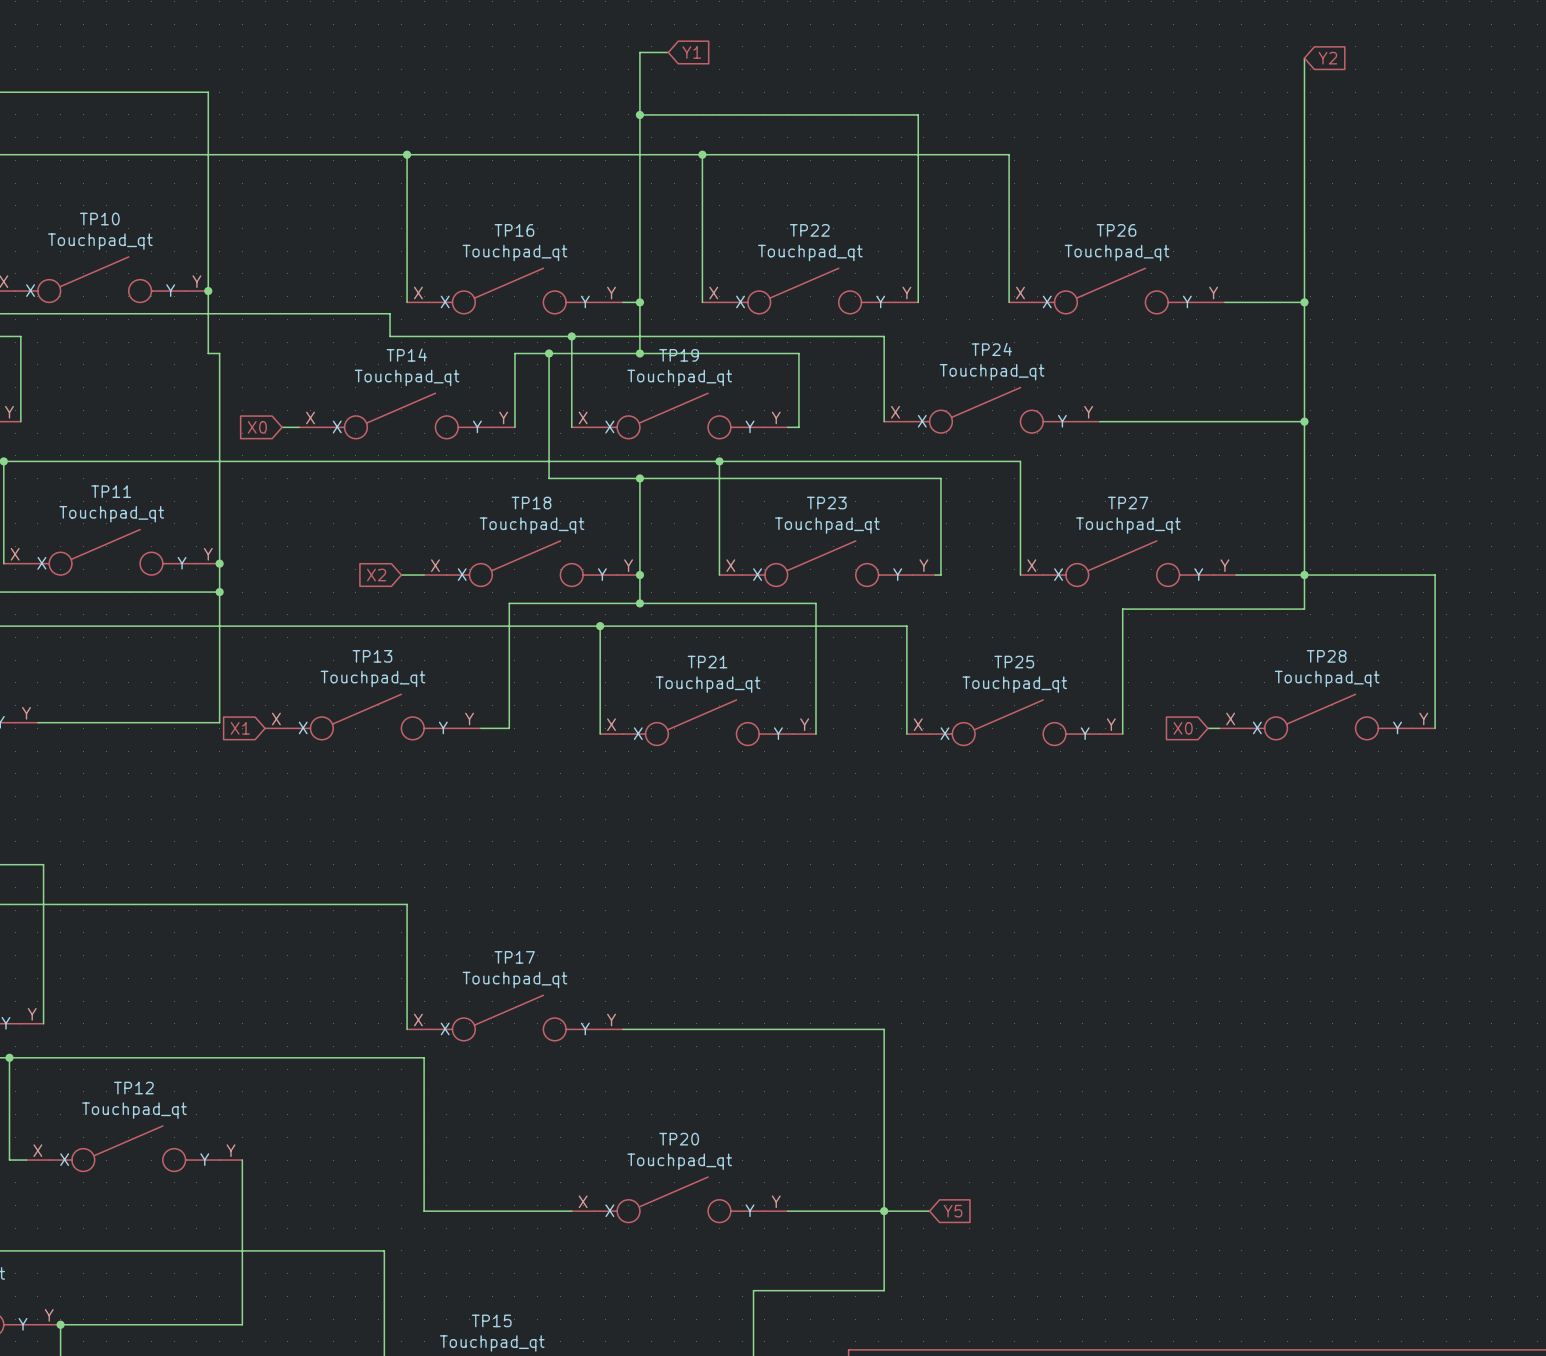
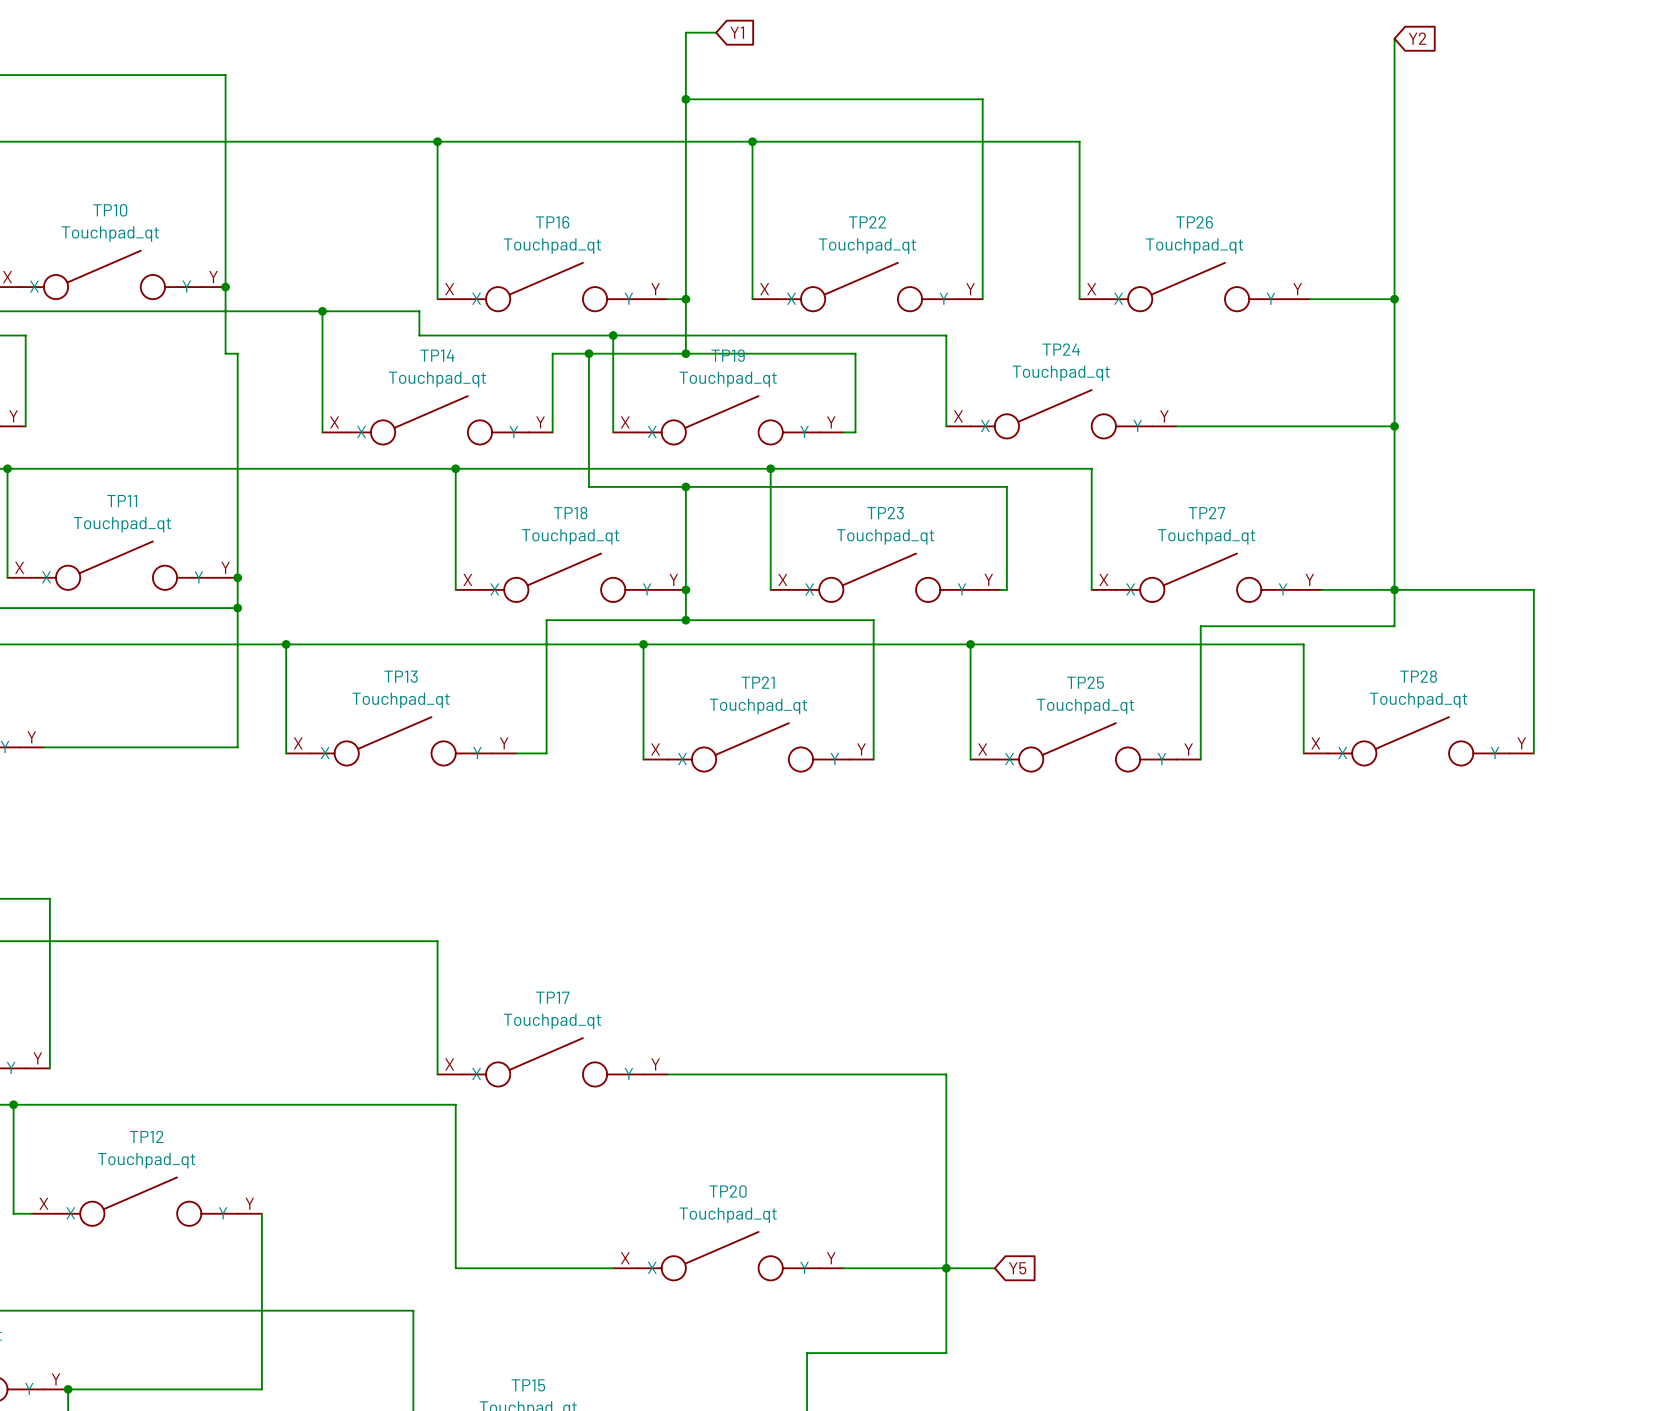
junction: none -> (322, 311)
global label: X0 (257, 427) -> none
wire: (282, 427) (299, 427) -> (322, 311) (322, 432)
junction: none -> (455, 468)
global label: X2 (376, 575) -> none
wire: (401, 575) (424, 575) -> (455, 468) (455, 589)
wire: none -> (286, 644) (286, 753)
junction: none -> (286, 644)
junction: none -> (970, 644)
global label: X1 (240, 728) -> none
global label: X0 (1183, 728) -> none
wire: (1207, 728) (1219, 728) -> (970, 644) (1303, 644) (1303, 753)

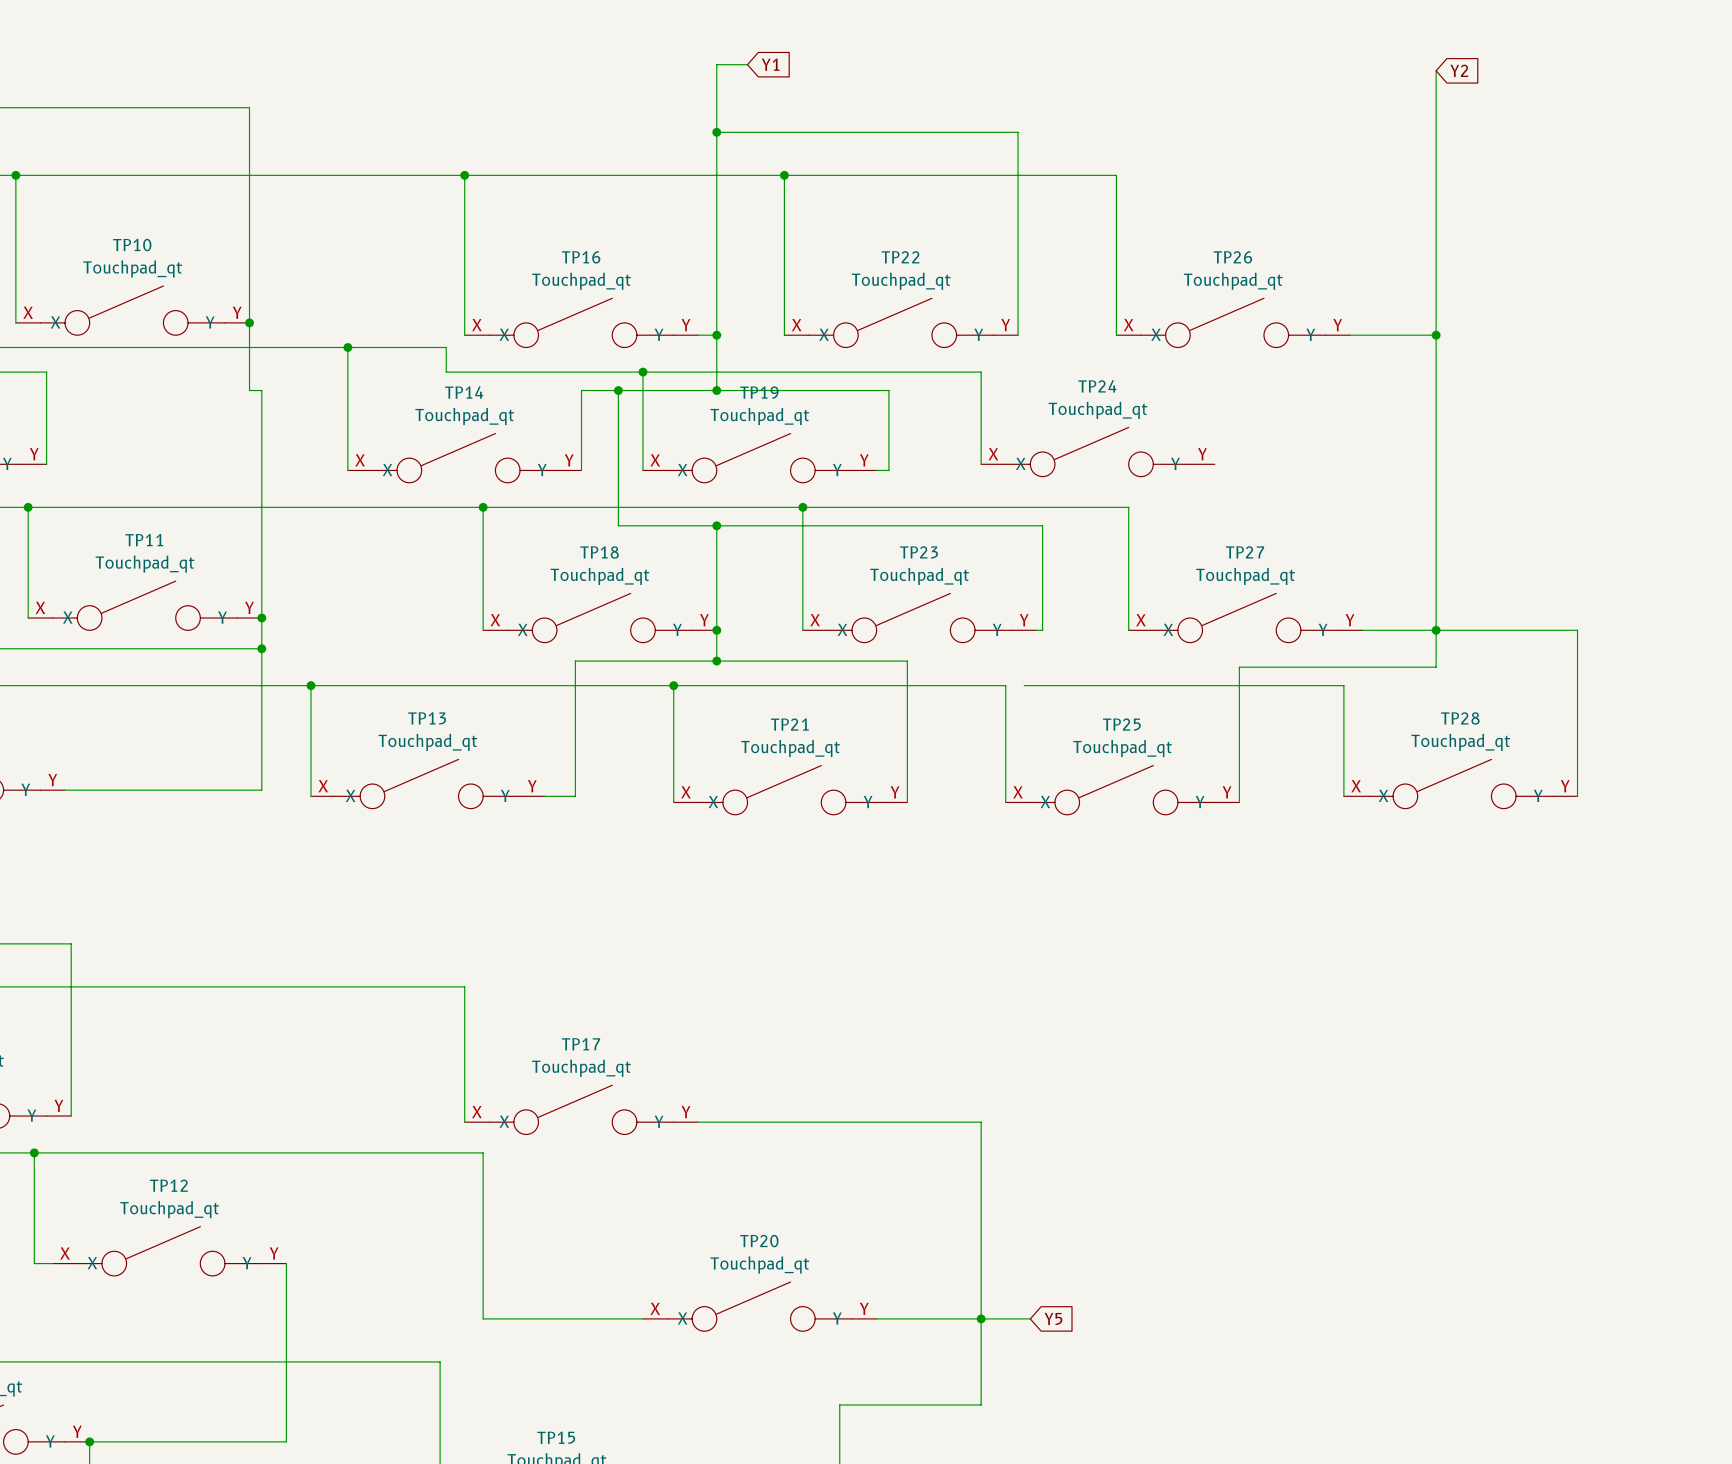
wire: (1176, 426) (1394, 426) -> none
junction: (1394, 426) -> none
wire: (970, 644) (988, 644) -> none
junction: (970, 644) -> none

